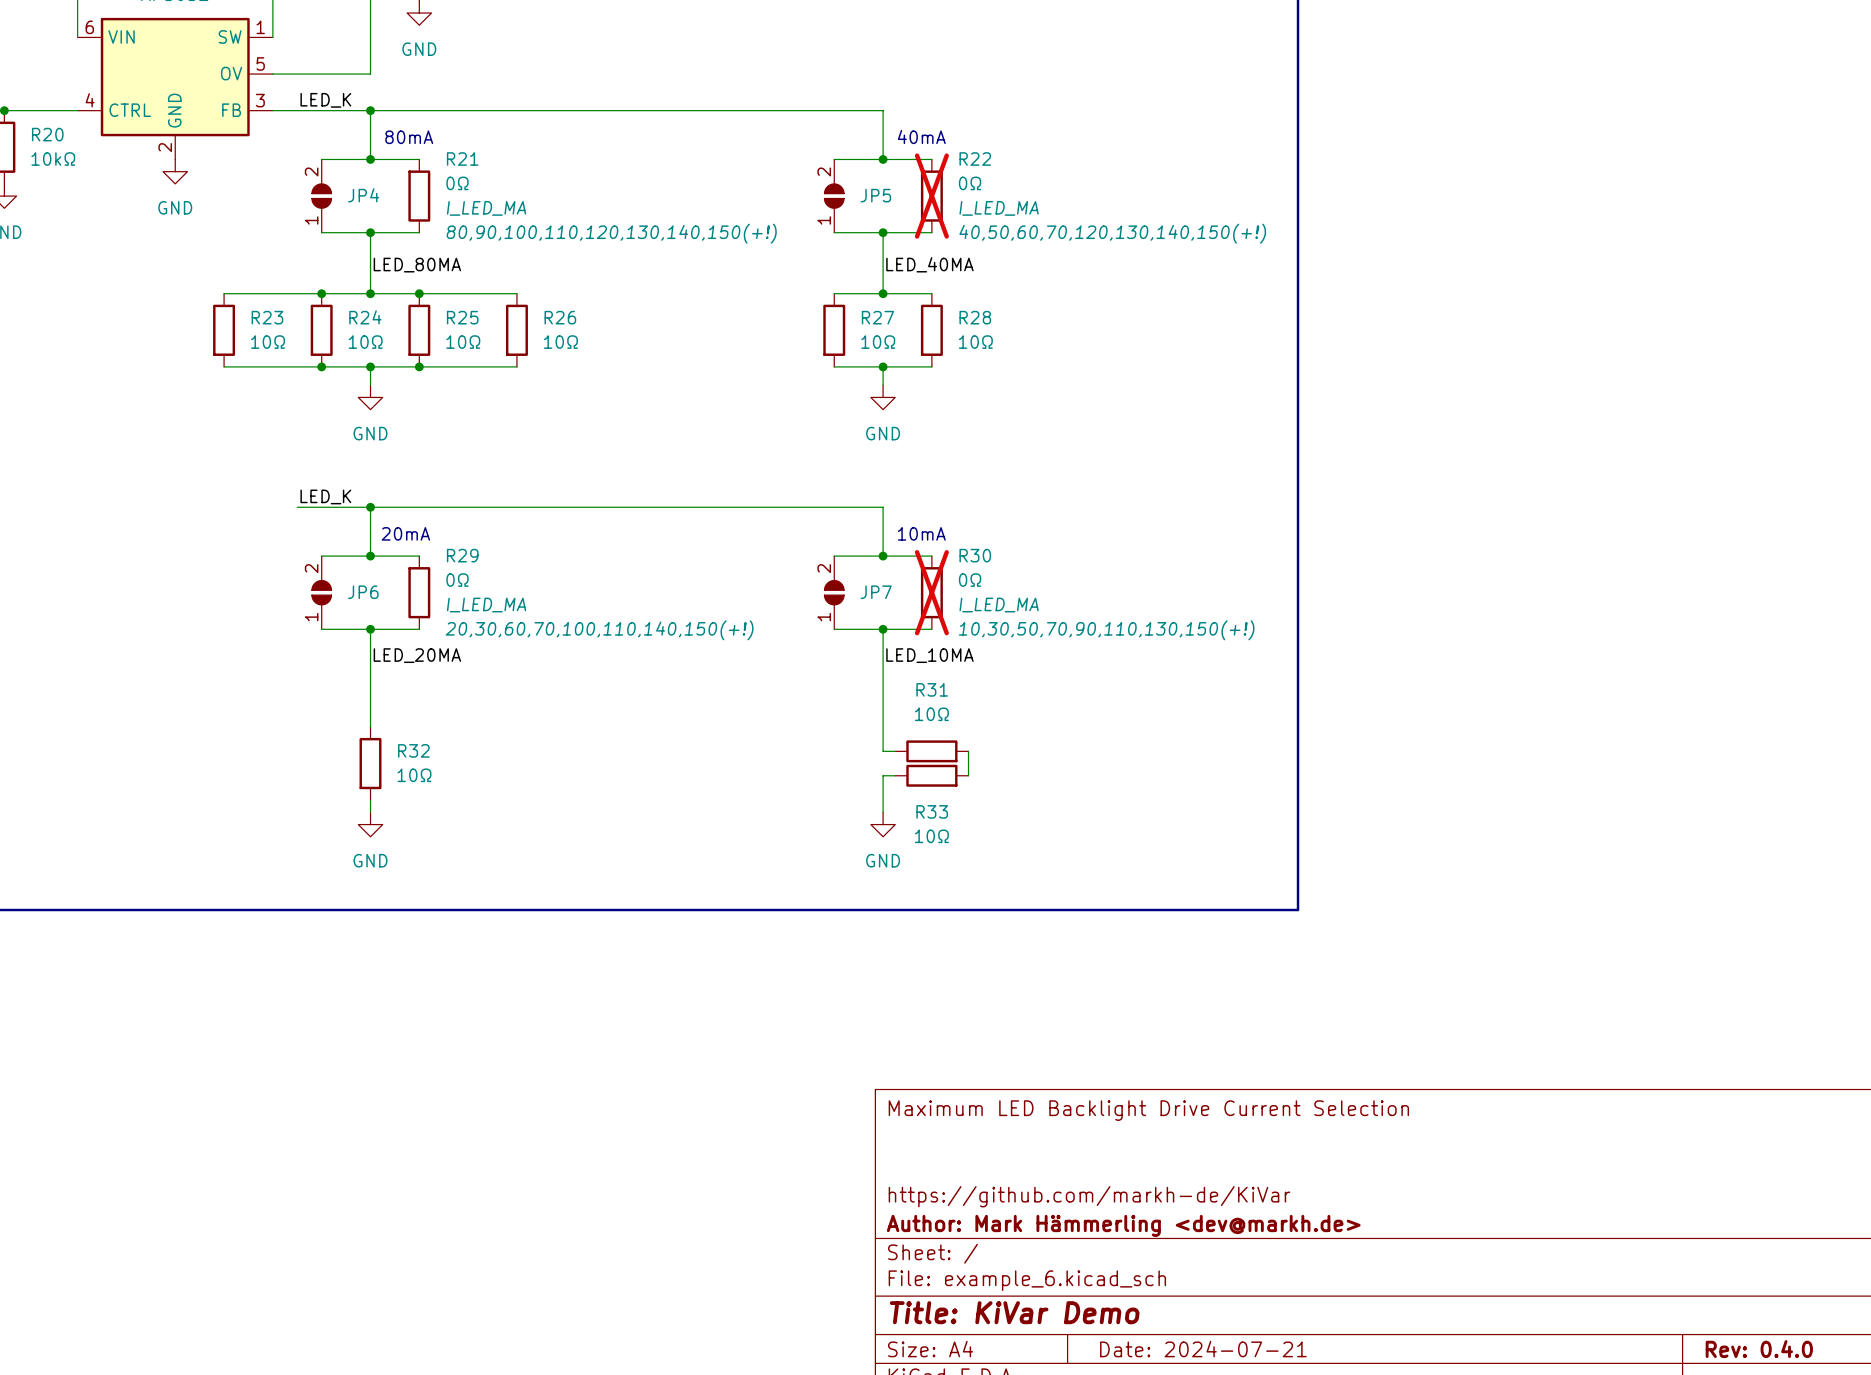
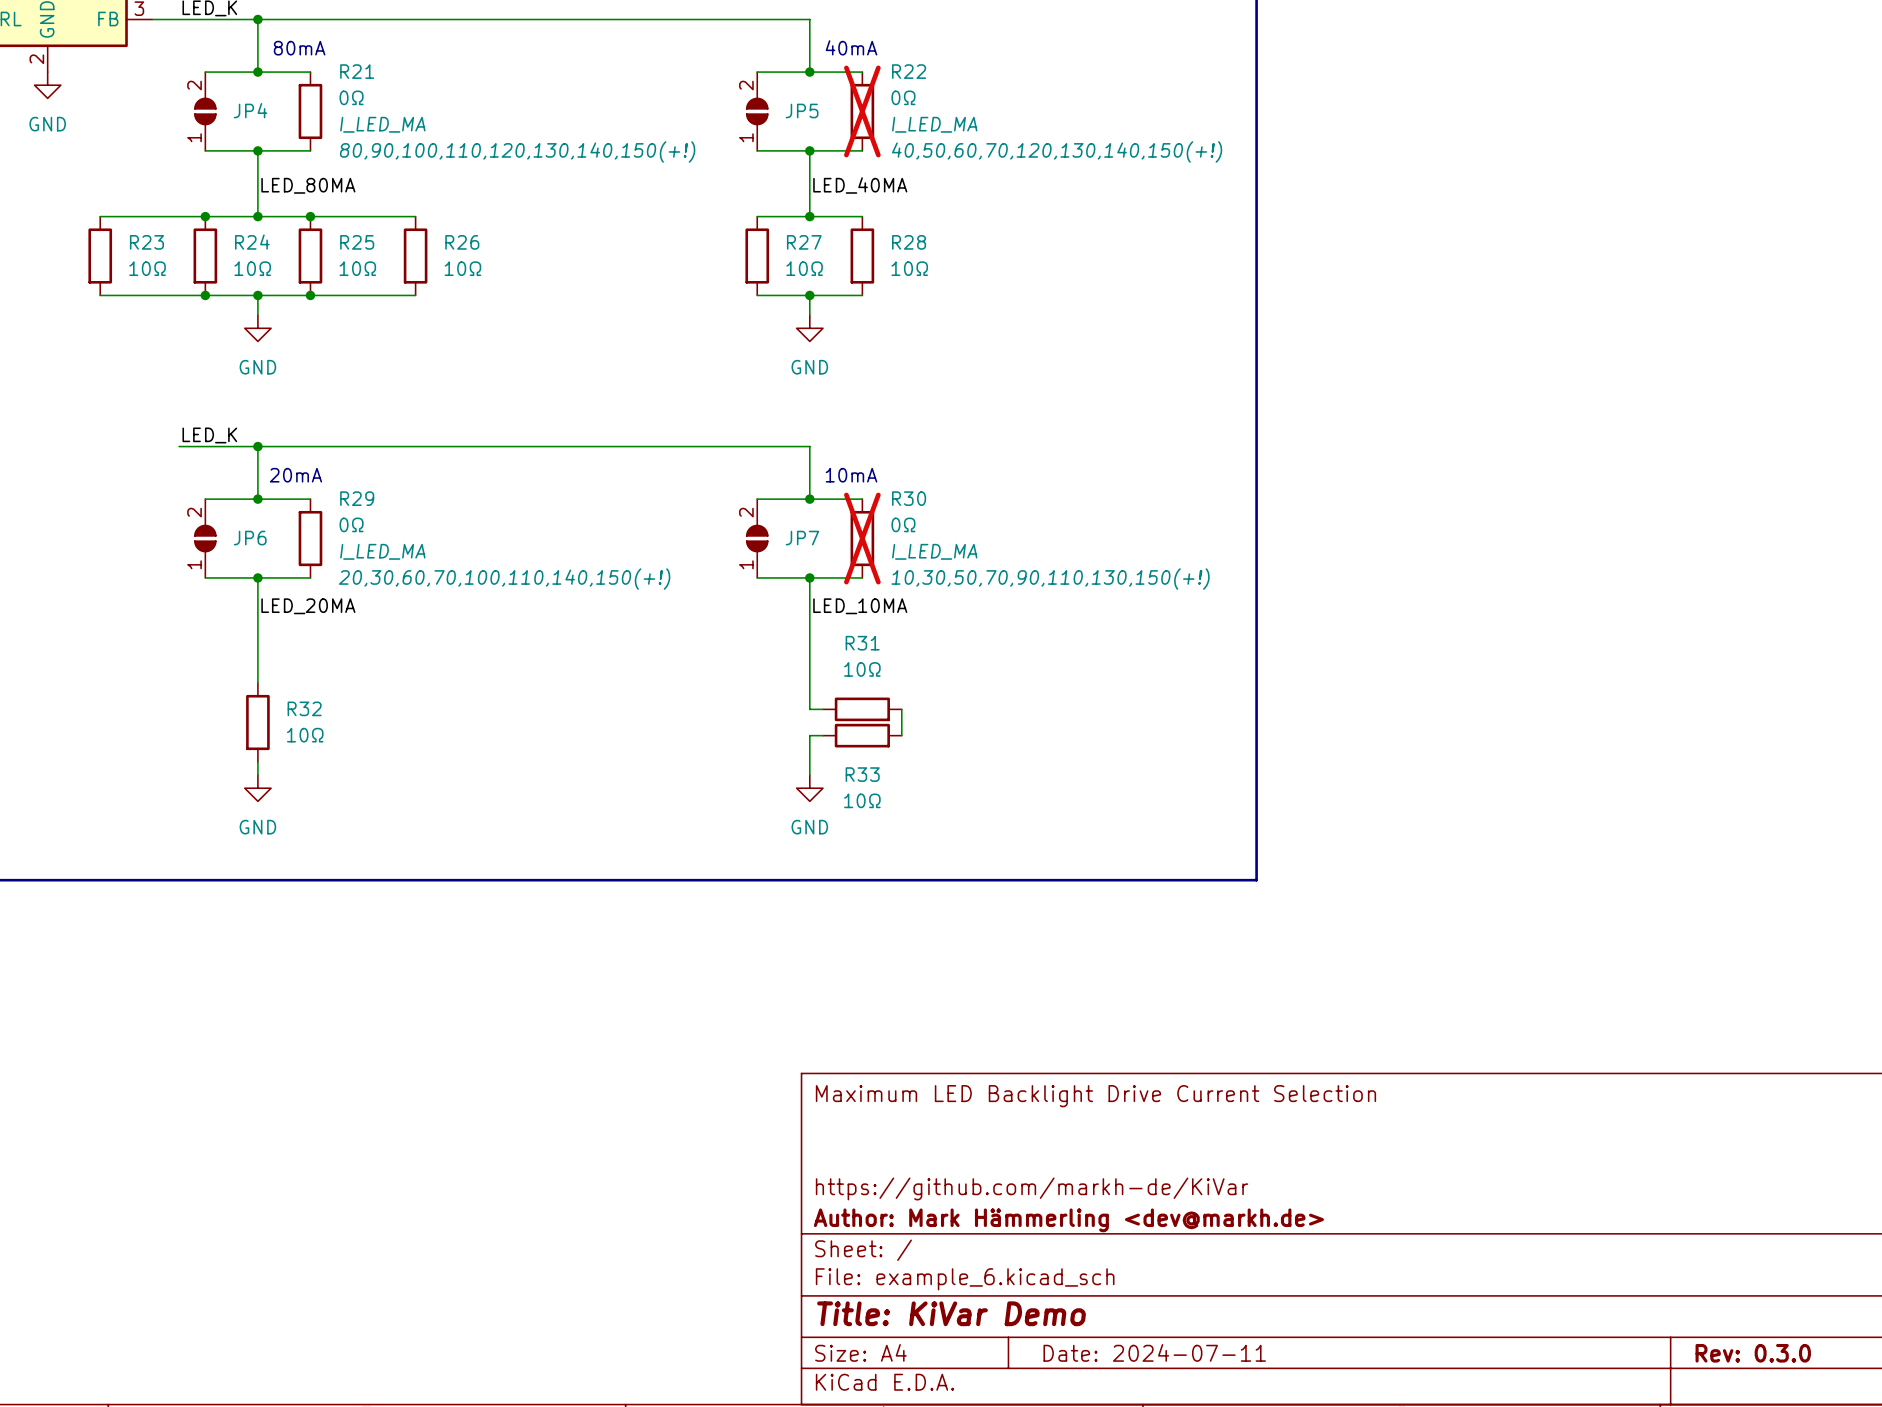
title block: Date: 2024-07-21 (1203, 1349) -> Date: 2024-07-11 (1154, 1352)
title block: Rev: 0.4.0 (1759, 1349) -> Rev: 0.3.0 (1753, 1353)

